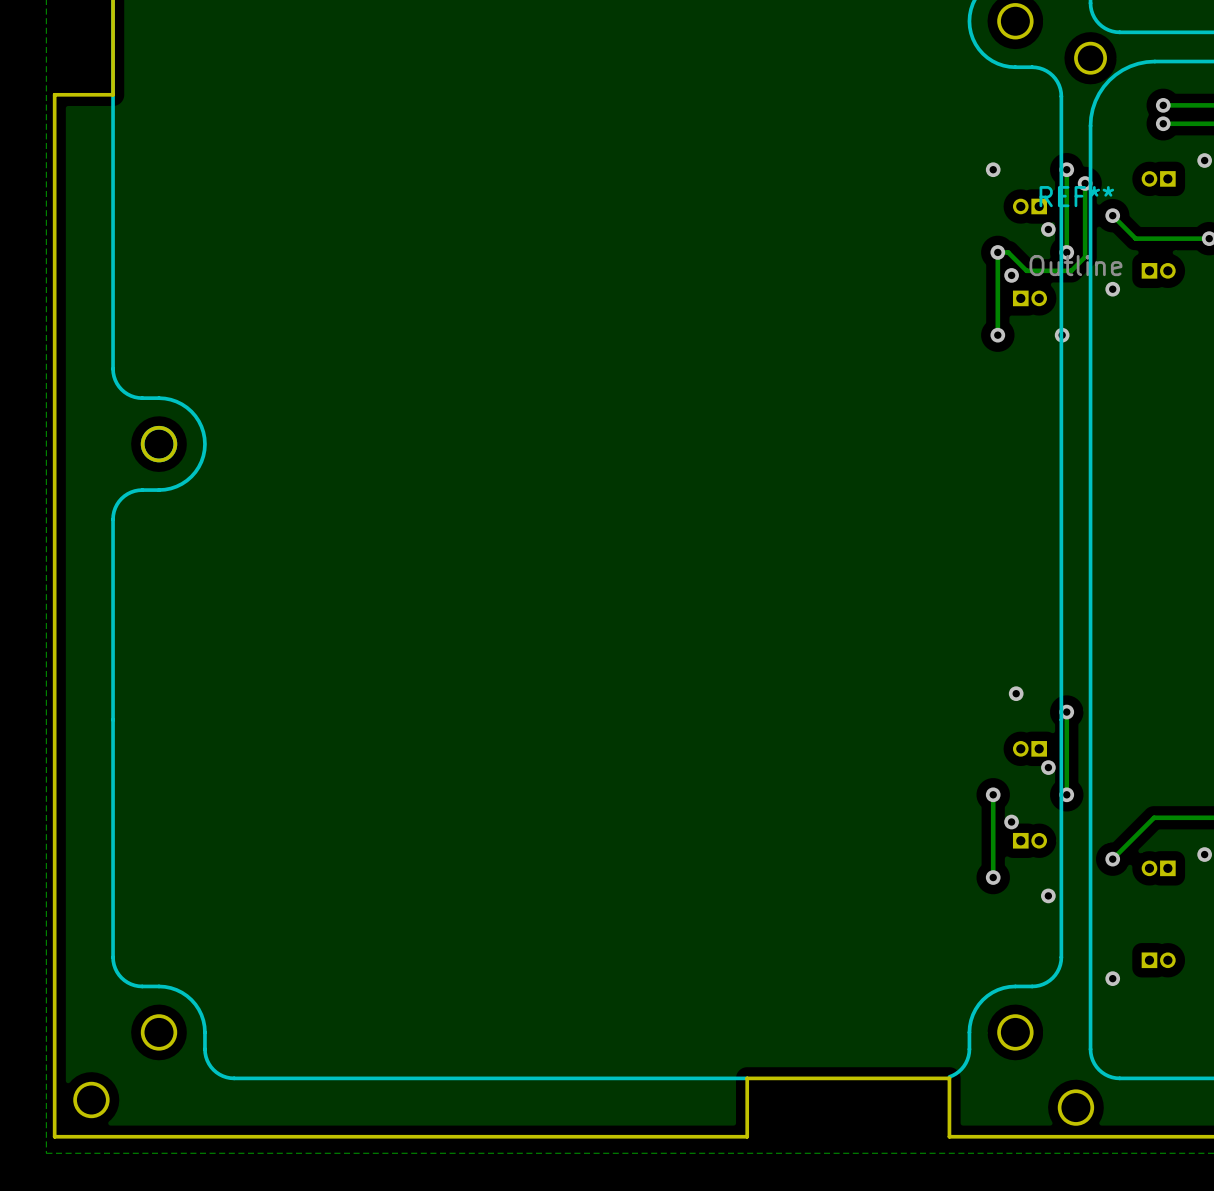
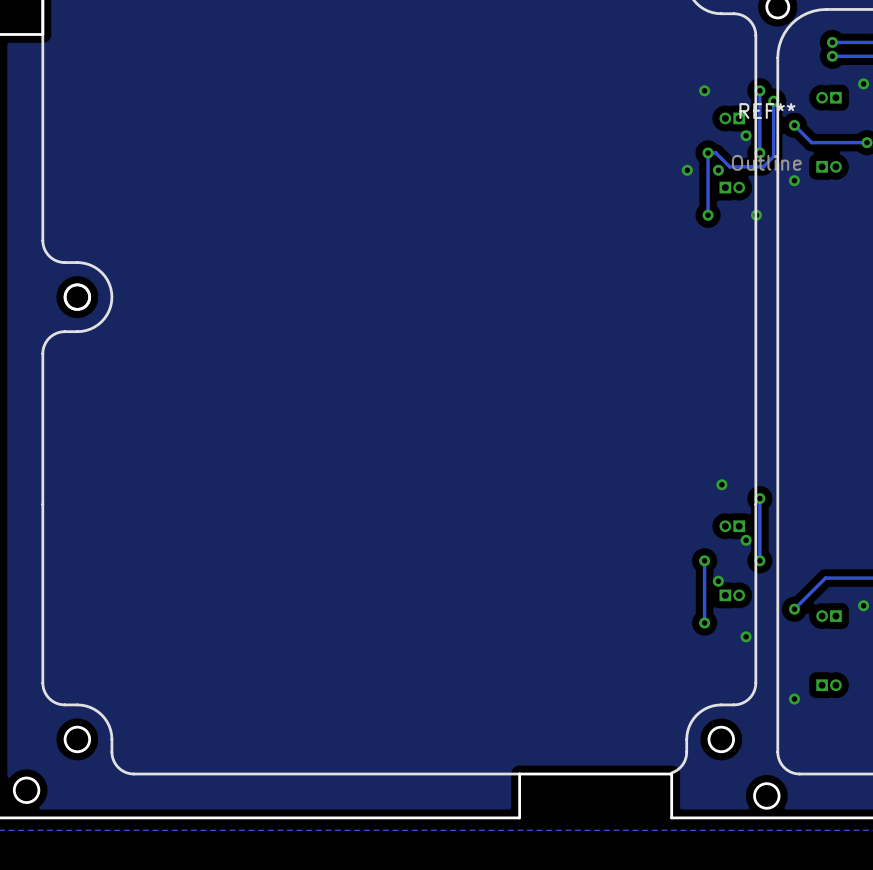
via: none -> (687, 170)

